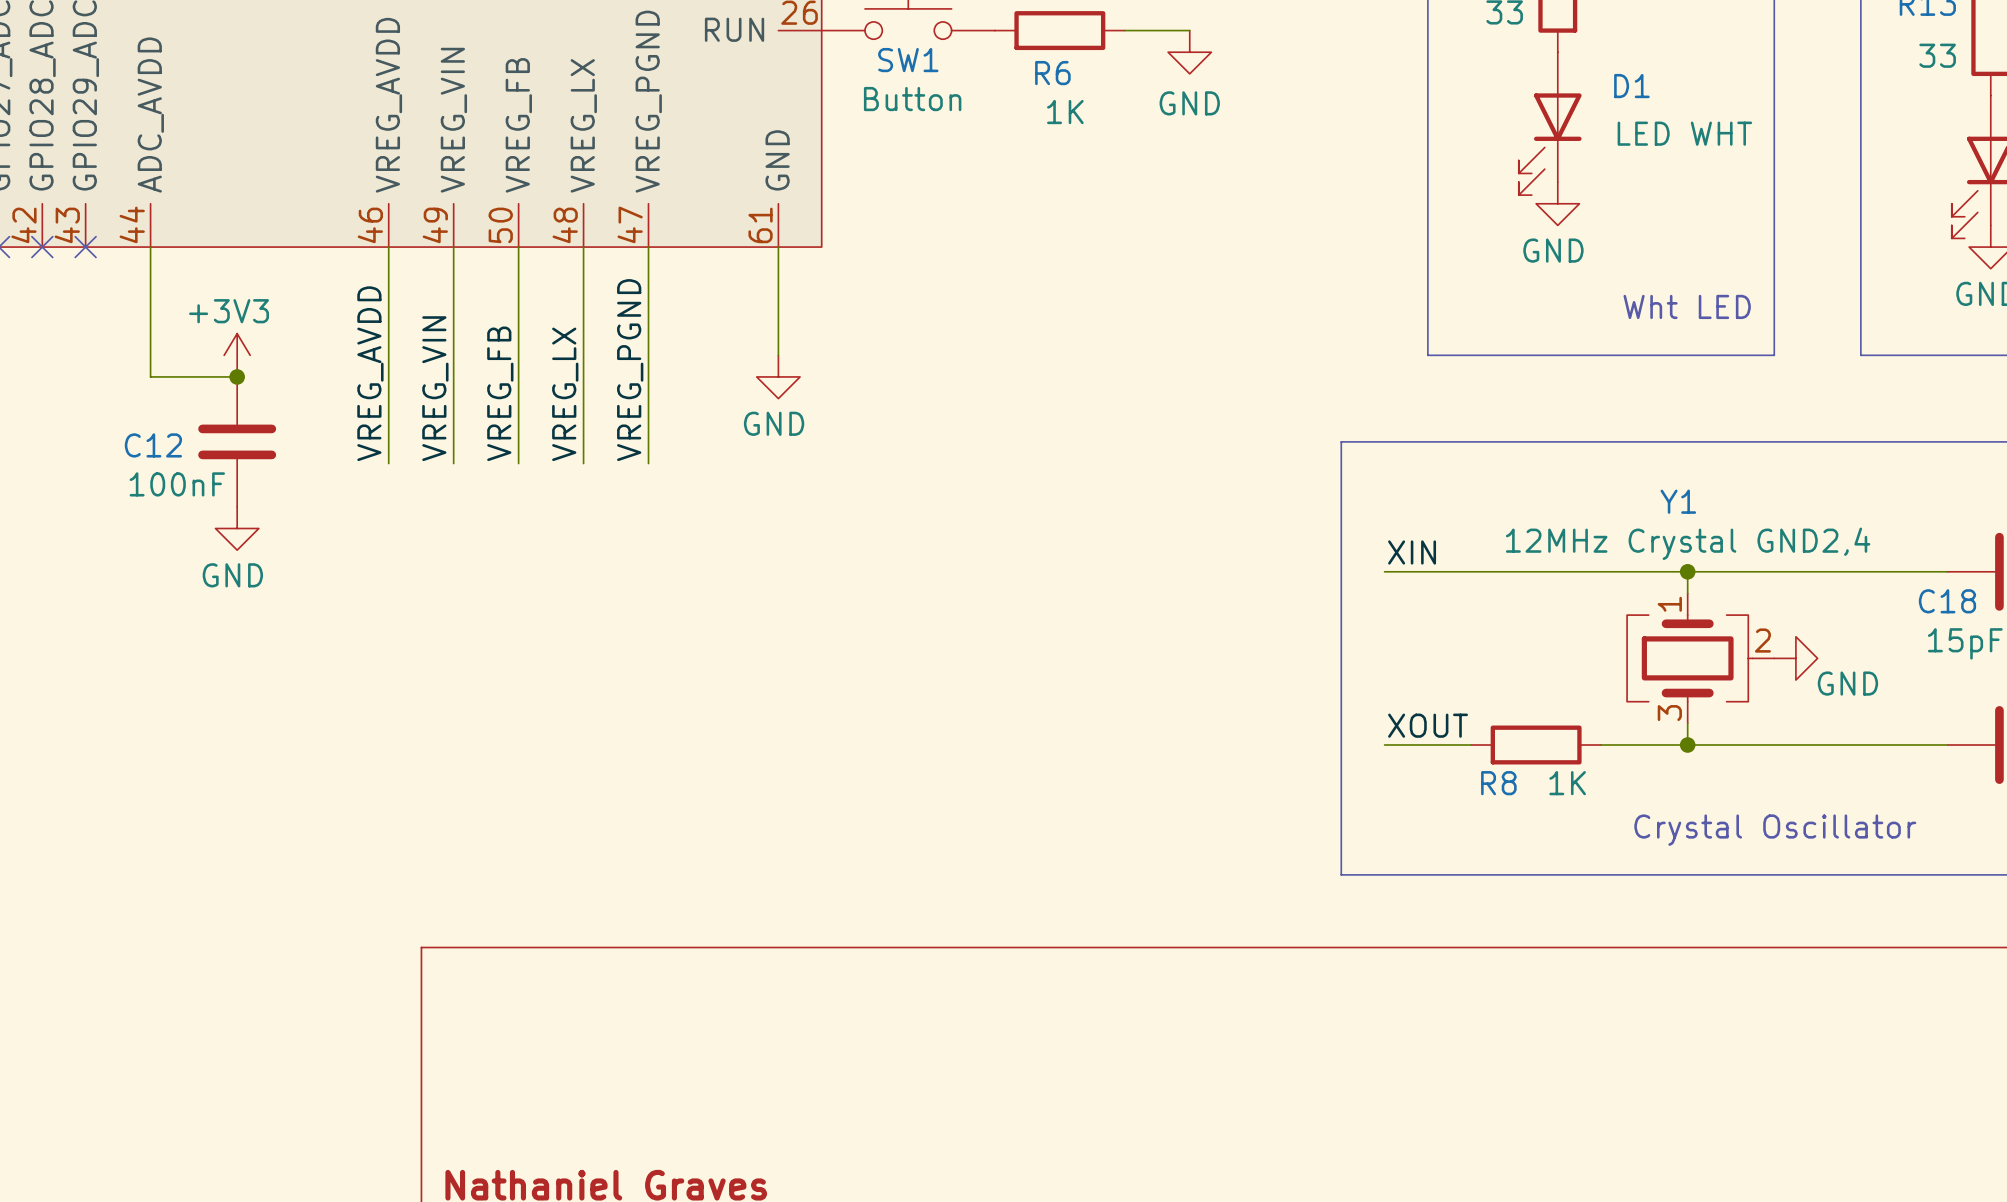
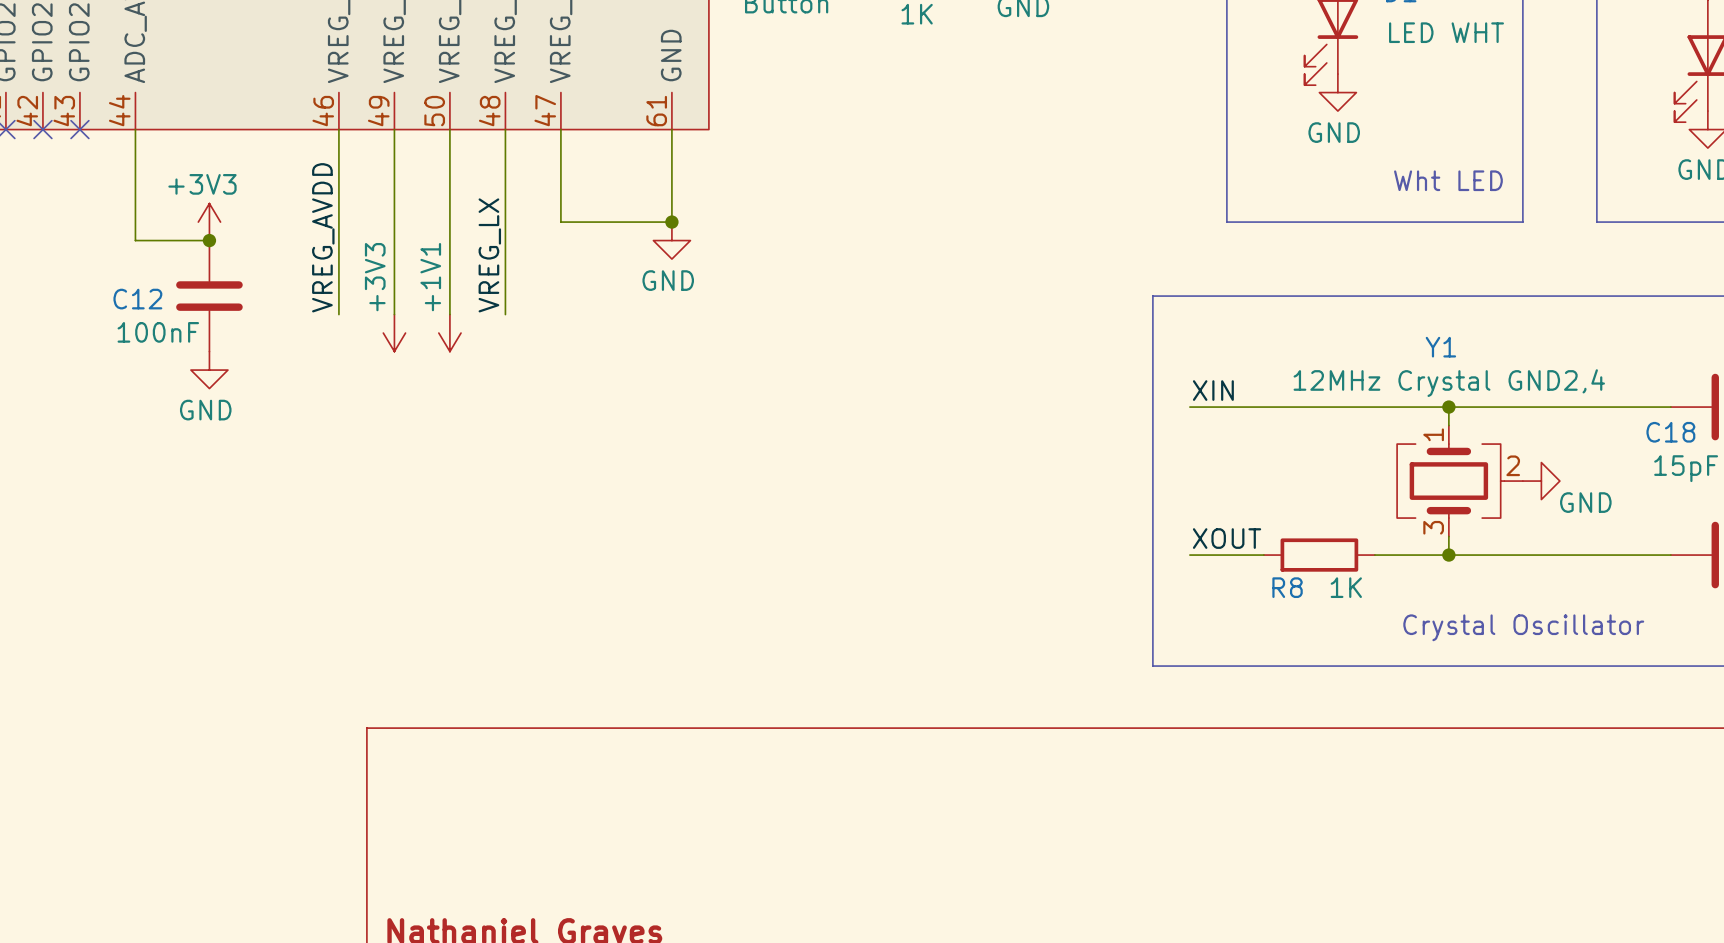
wire: (648, 355) (648, 463) -> (560, 222) (671, 222)
junction: none -> (671, 222)
label: VREG_PGND (630, 370) -> none
label: VREG_VIN (435, 388) -> none
label: VREG_FB (500, 393) -> none
power symbol: none -> +3V3 (394, 333)
power symbol: none -> +1V1 (449, 333)

